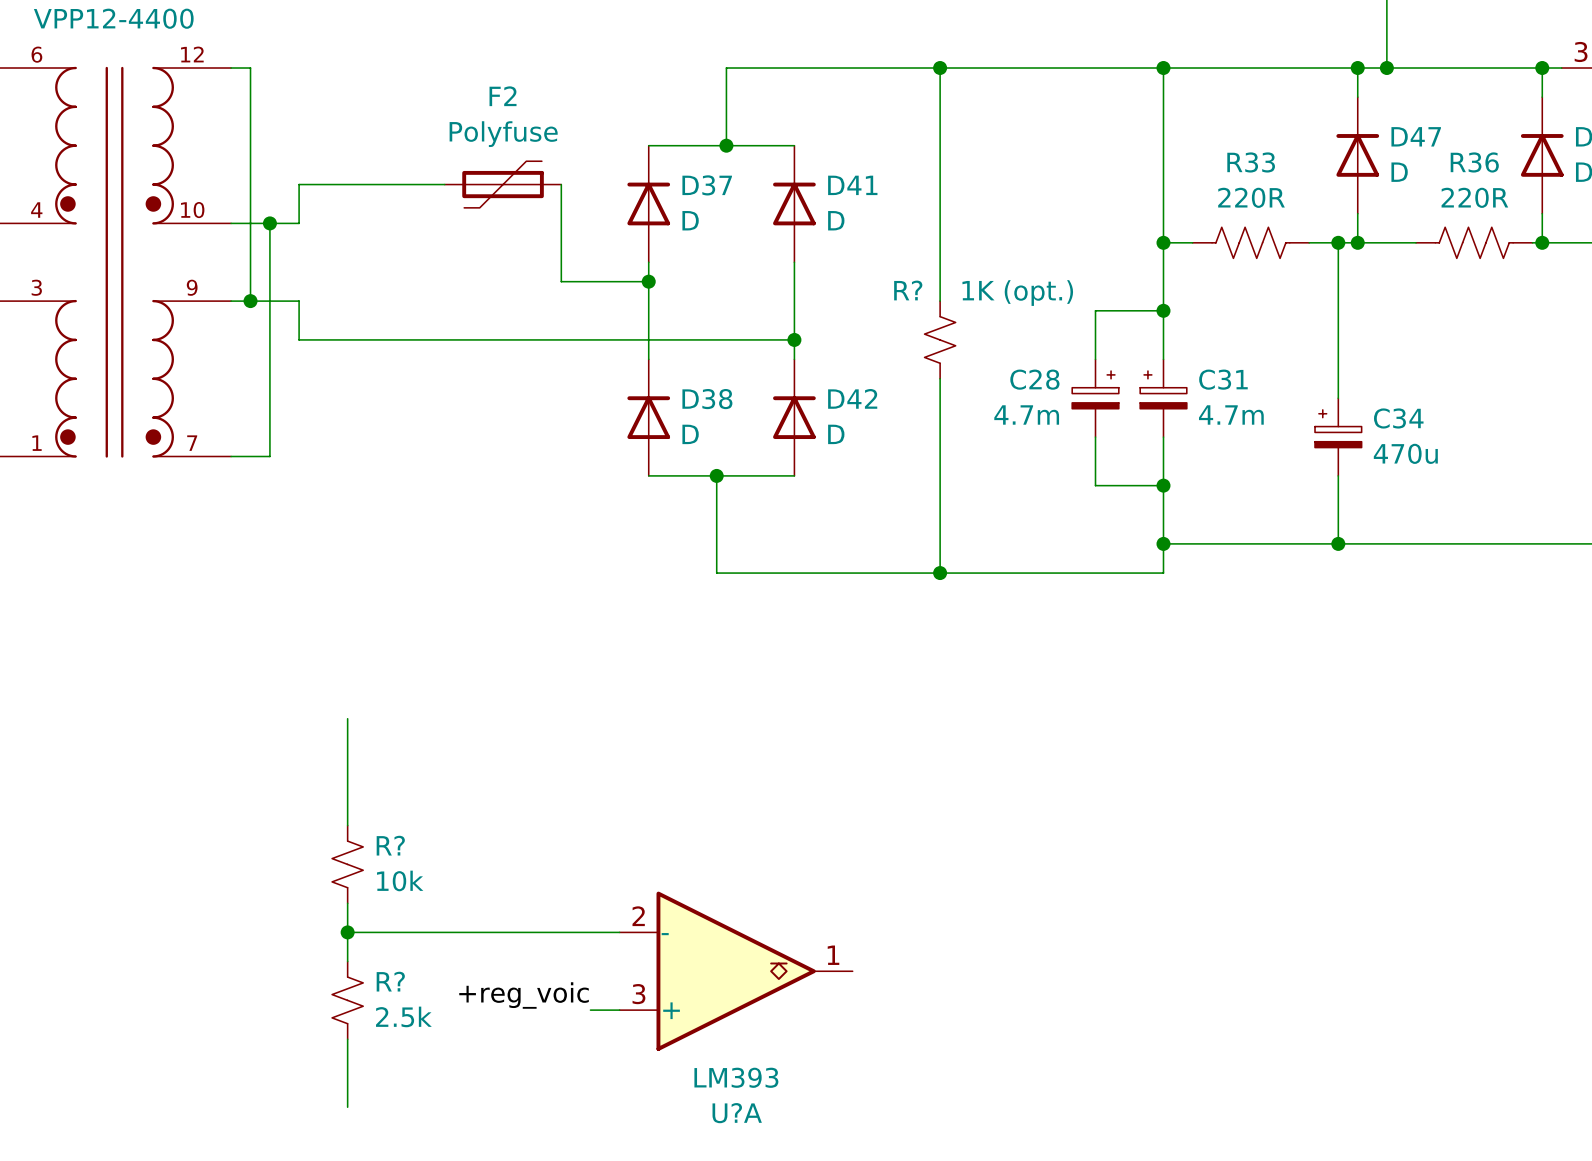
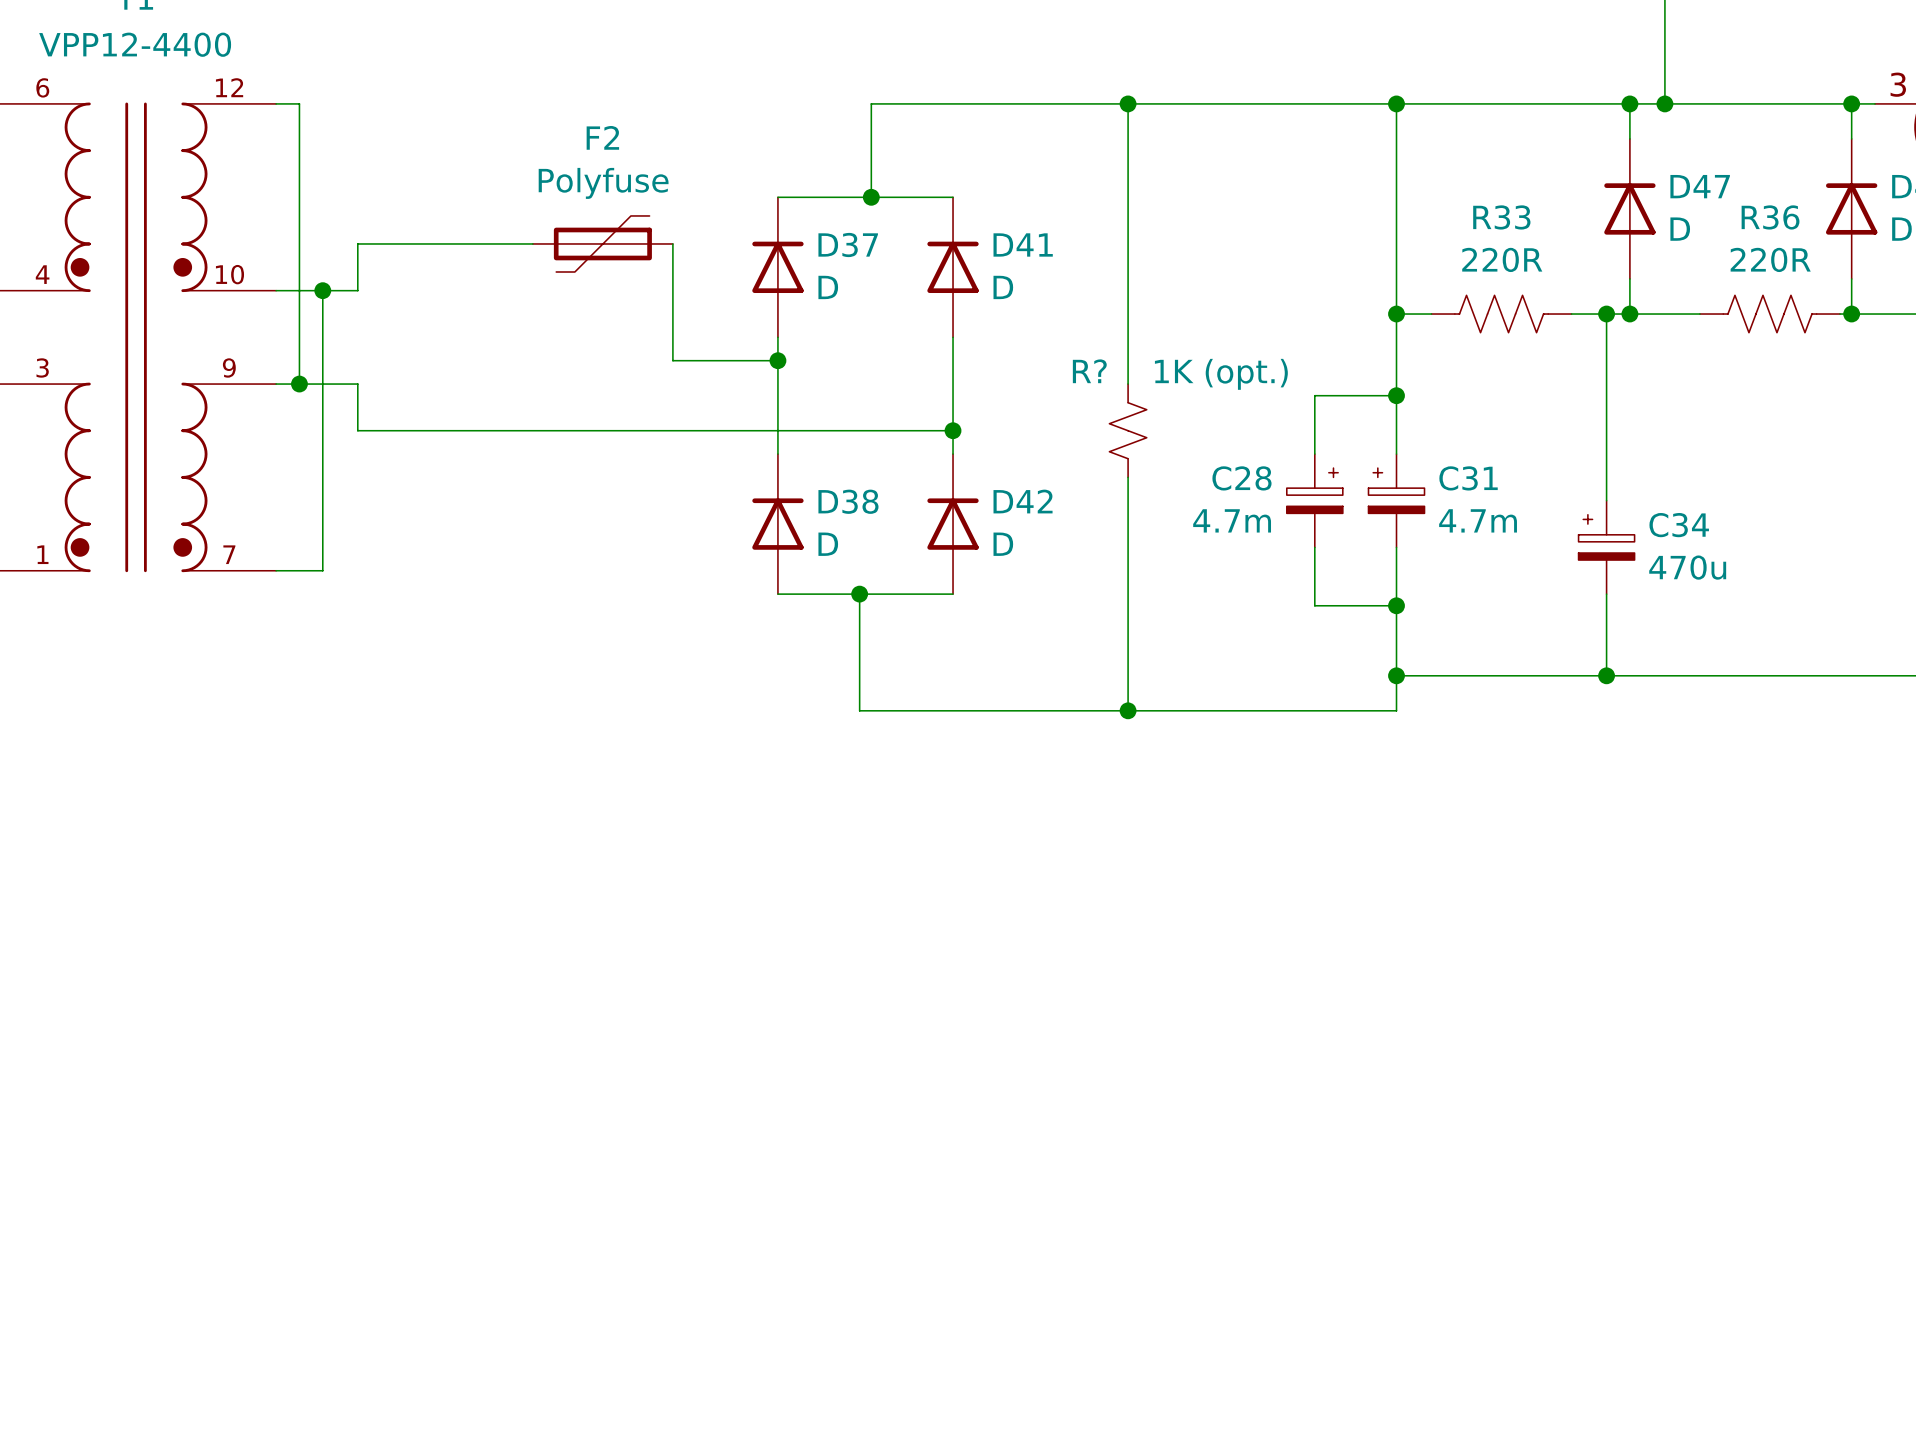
wire: (347, 718) (347, 825) -> none
R?: 10k (347, 864) -> none
wire: (347, 903) (347, 961) -> none
wire: (347, 932) (619, 932) -> none
junction: (347, 932) -> none
U?A: LM393 (736, 971) -> none
label: +reg_voic (524, 995) -> none
R?: 2.5k (347, 1000) -> none
wire: (590, 1010) (619, 1010) -> none
wire: (347, 1039) (347, 1107) -> none

